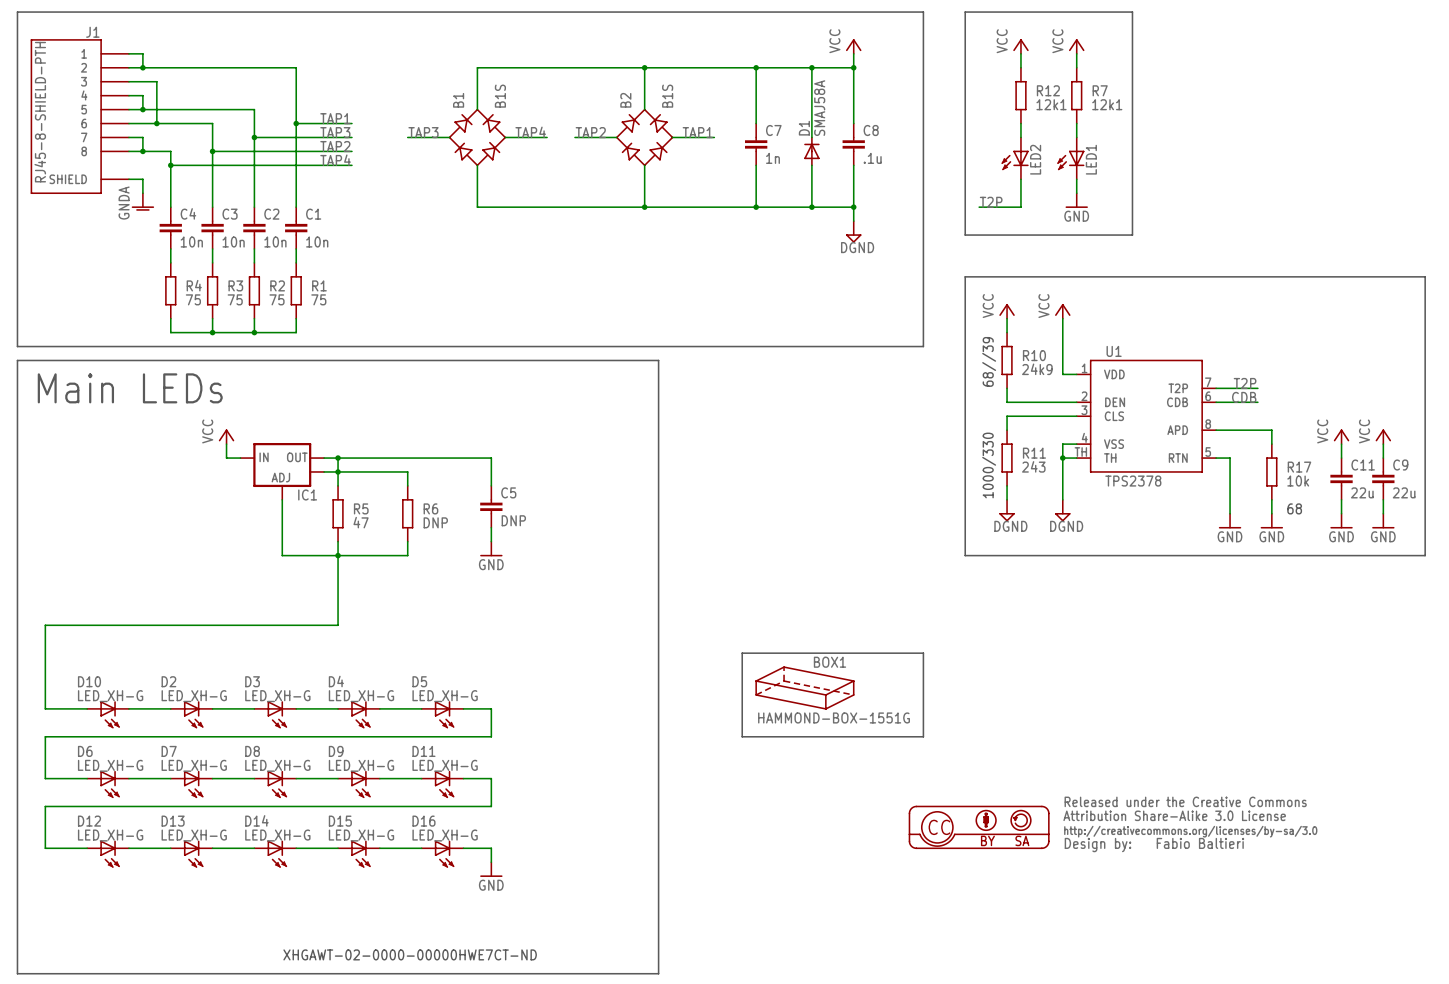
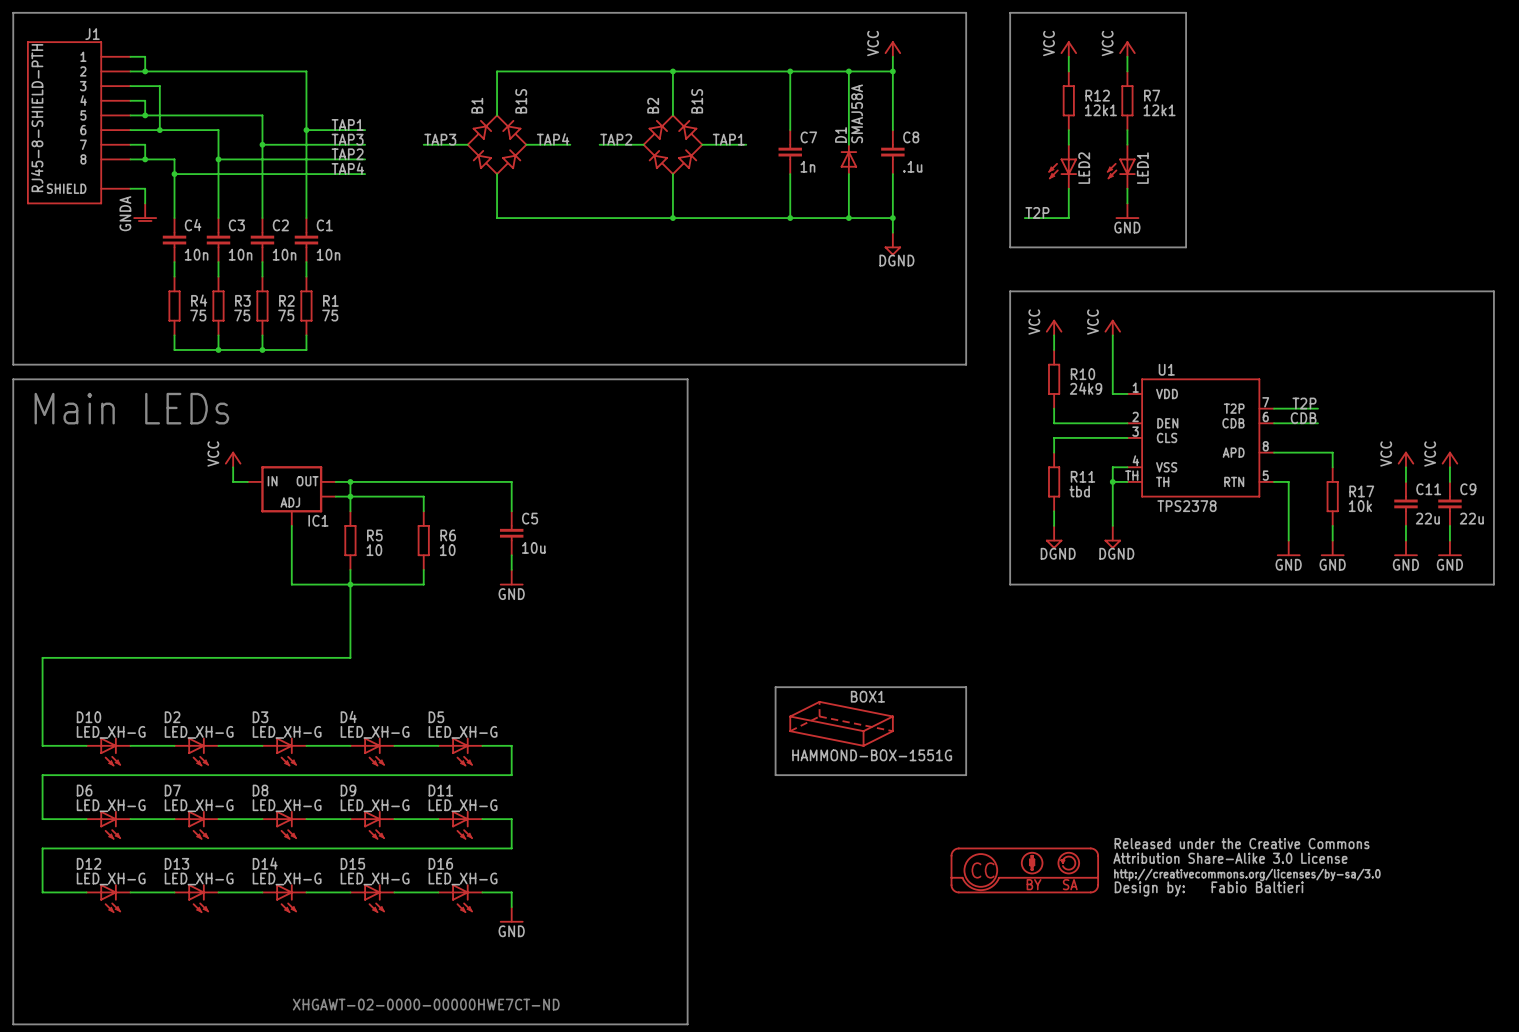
text: 68//39 (989, 361) -> none
text: 1000/330 (989, 465) -> none
R11 value: 243 (1033, 466) -> tbd (1079, 491)
text: 68 (1294, 508) -> none
C5 value: DNP (513, 520) -> 10u (533, 547)
R5 value: 47 (361, 522) -> 10 (374, 550)
R6 value: DNP (435, 522) -> 10 (447, 550)

